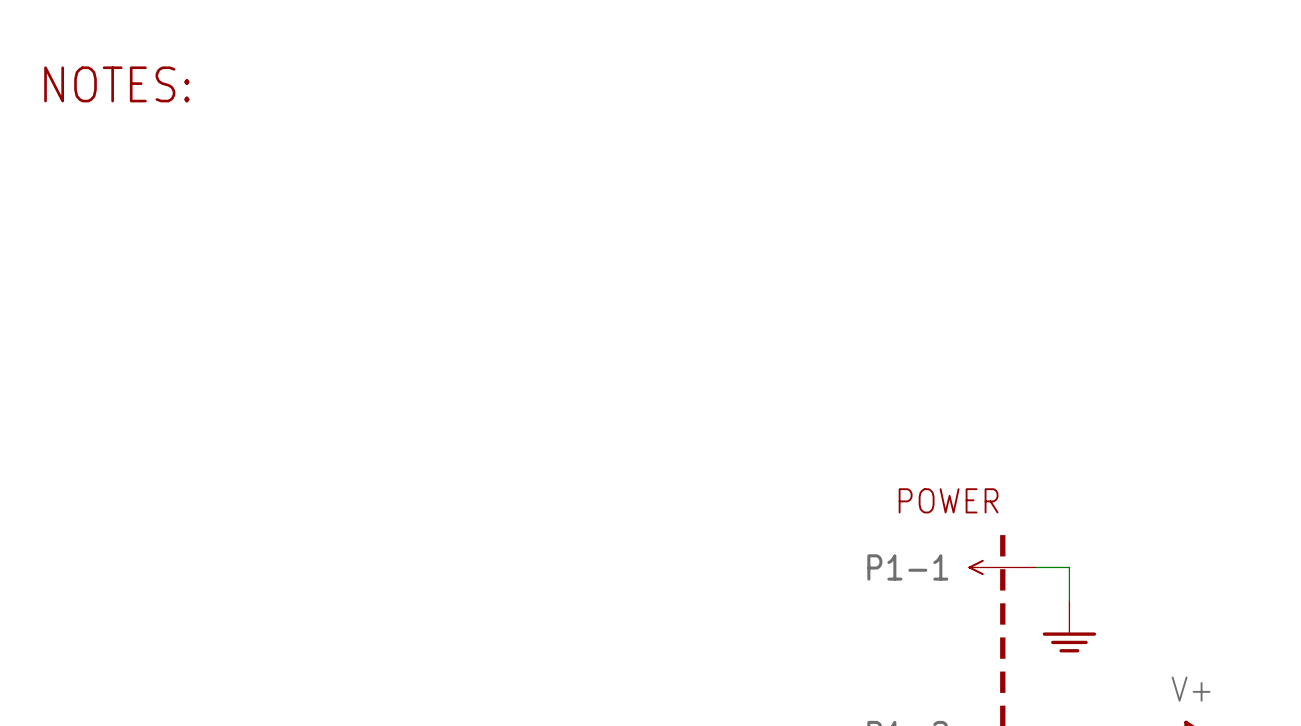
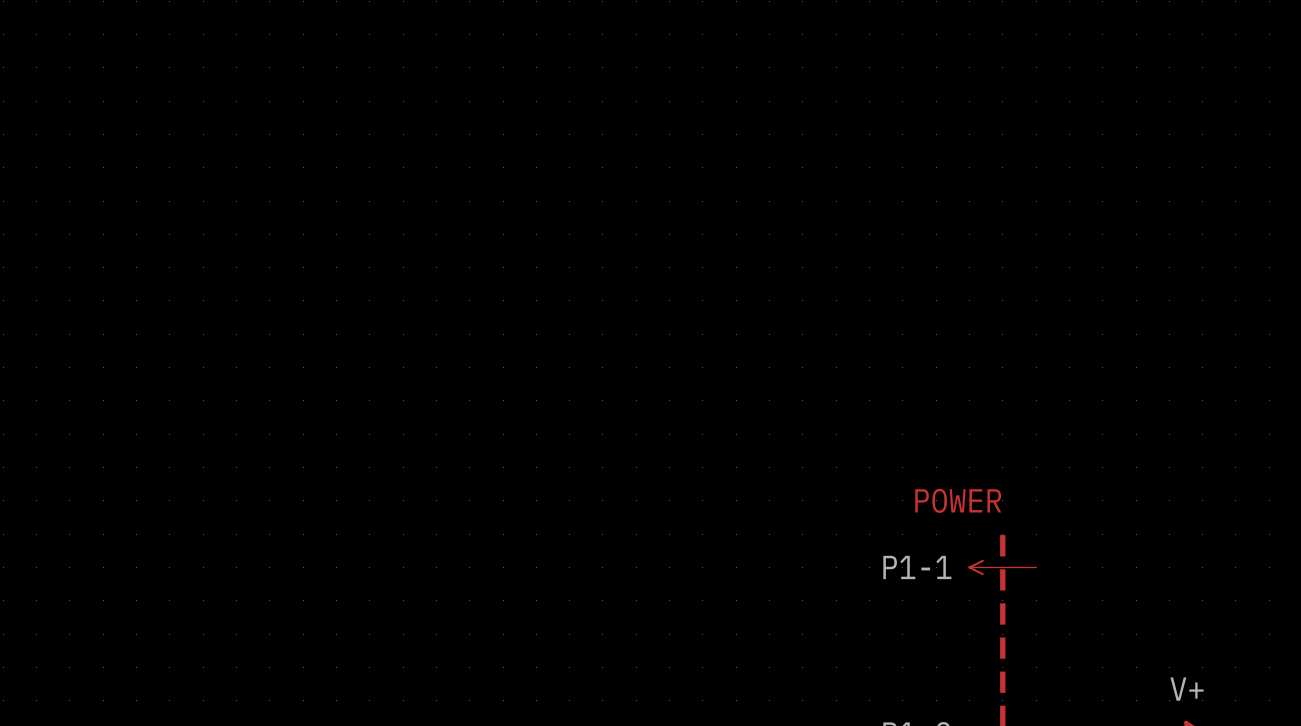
text: NOTES: (116, 84) -> none
wire: (1036, 567) (1069, 567) (1069, 600) -> none
power symbol: (1069, 626) -> none

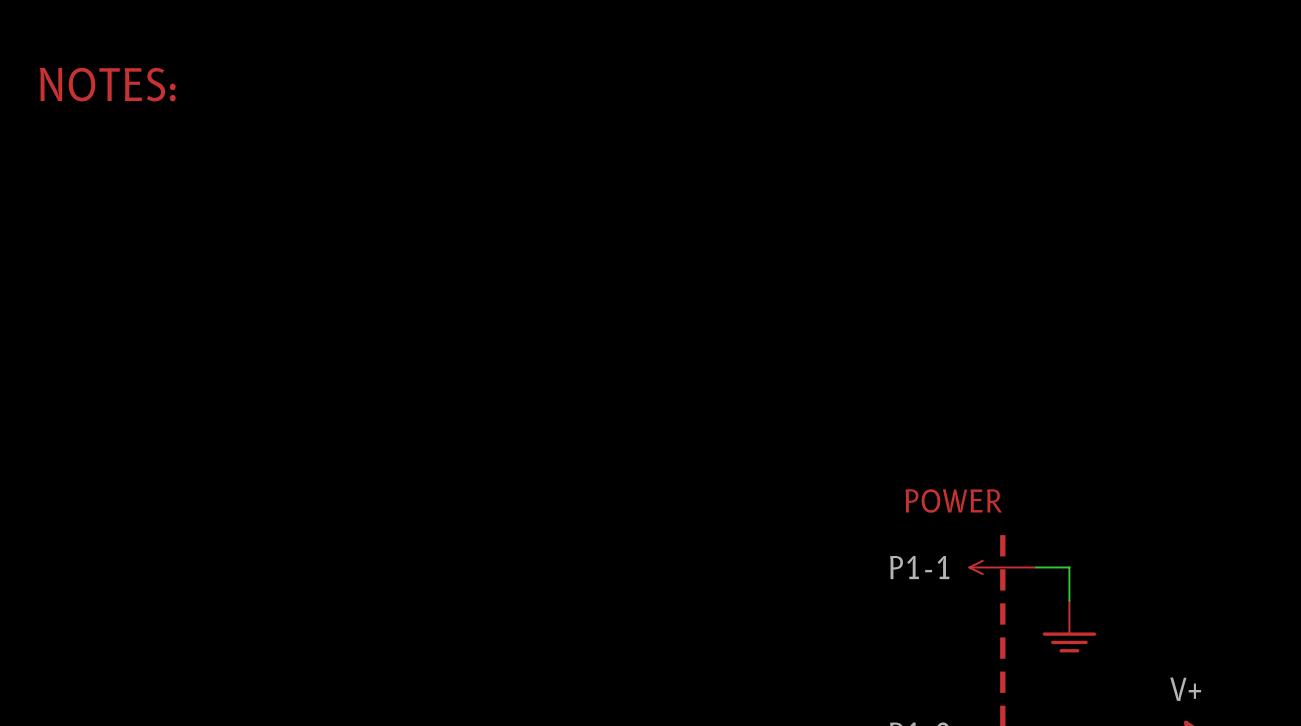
text: none -> NOTES: (107, 84)
wire: none -> (1036, 567) (1069, 567) (1069, 600)
power symbol: none -> (1069, 626)

